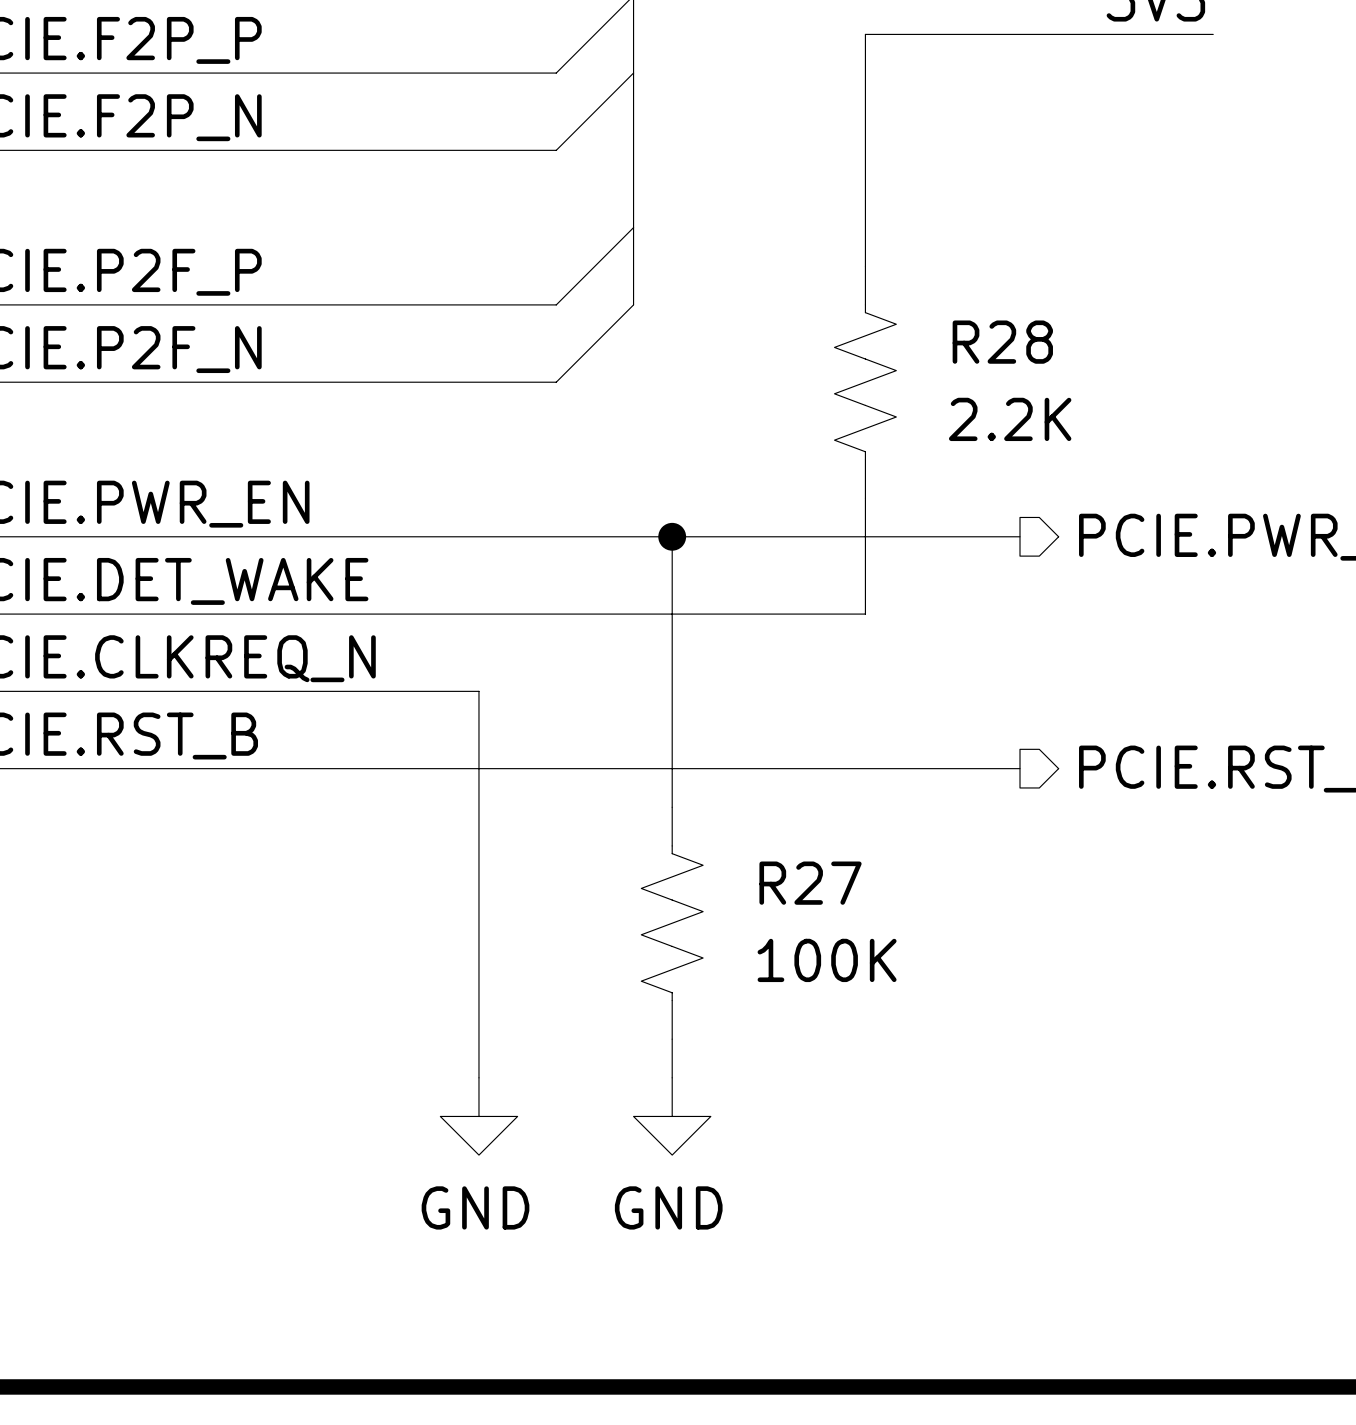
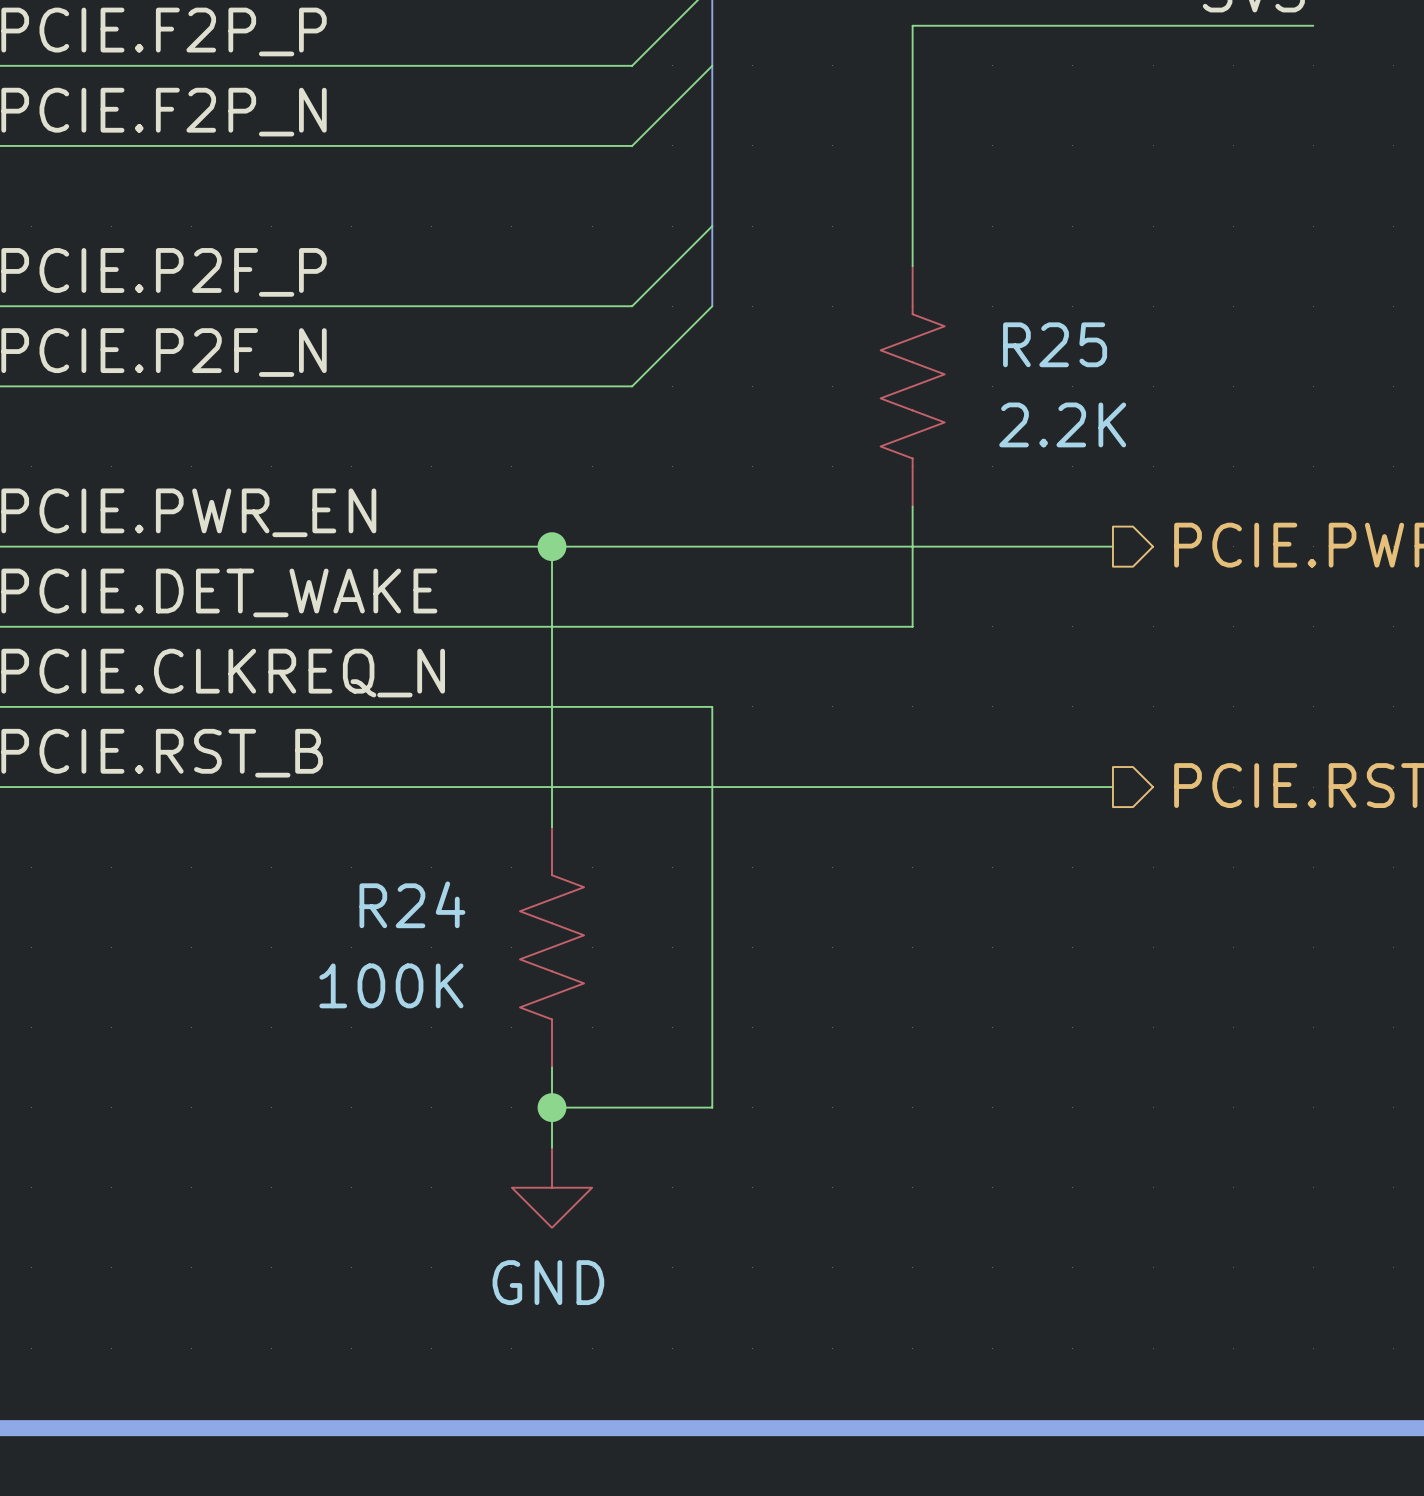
wire: (865, 34) (865, 266) -> (952, 25) (912, 25) (912, 266)
R25: none -> 2.2K (912, 386)
R28: 2.2K (865, 382) -> none
wire: (865, 498) (865, 614) (826, 614) -> (912, 506) (912, 626)
wire: none -> (552, 546) (552, 706) (712, 706) (712, 1107) (552, 1107) (552, 1147)
junction: none -> (552, 546)
wire: (672, 536) (672, 807) -> none
junction: (672, 536) -> none
wire: (478, 807) (478, 1039) -> none
R24: none -> 100K (552, 947)
R27: 100K (672, 923) -> none
wire: (672, 1039) (672, 1077) -> none
junction: none -> (552, 1107)
power symbol position: GND (478, 1116) -> GND (552, 1187)
power symbol: GND (672, 1116) -> none

